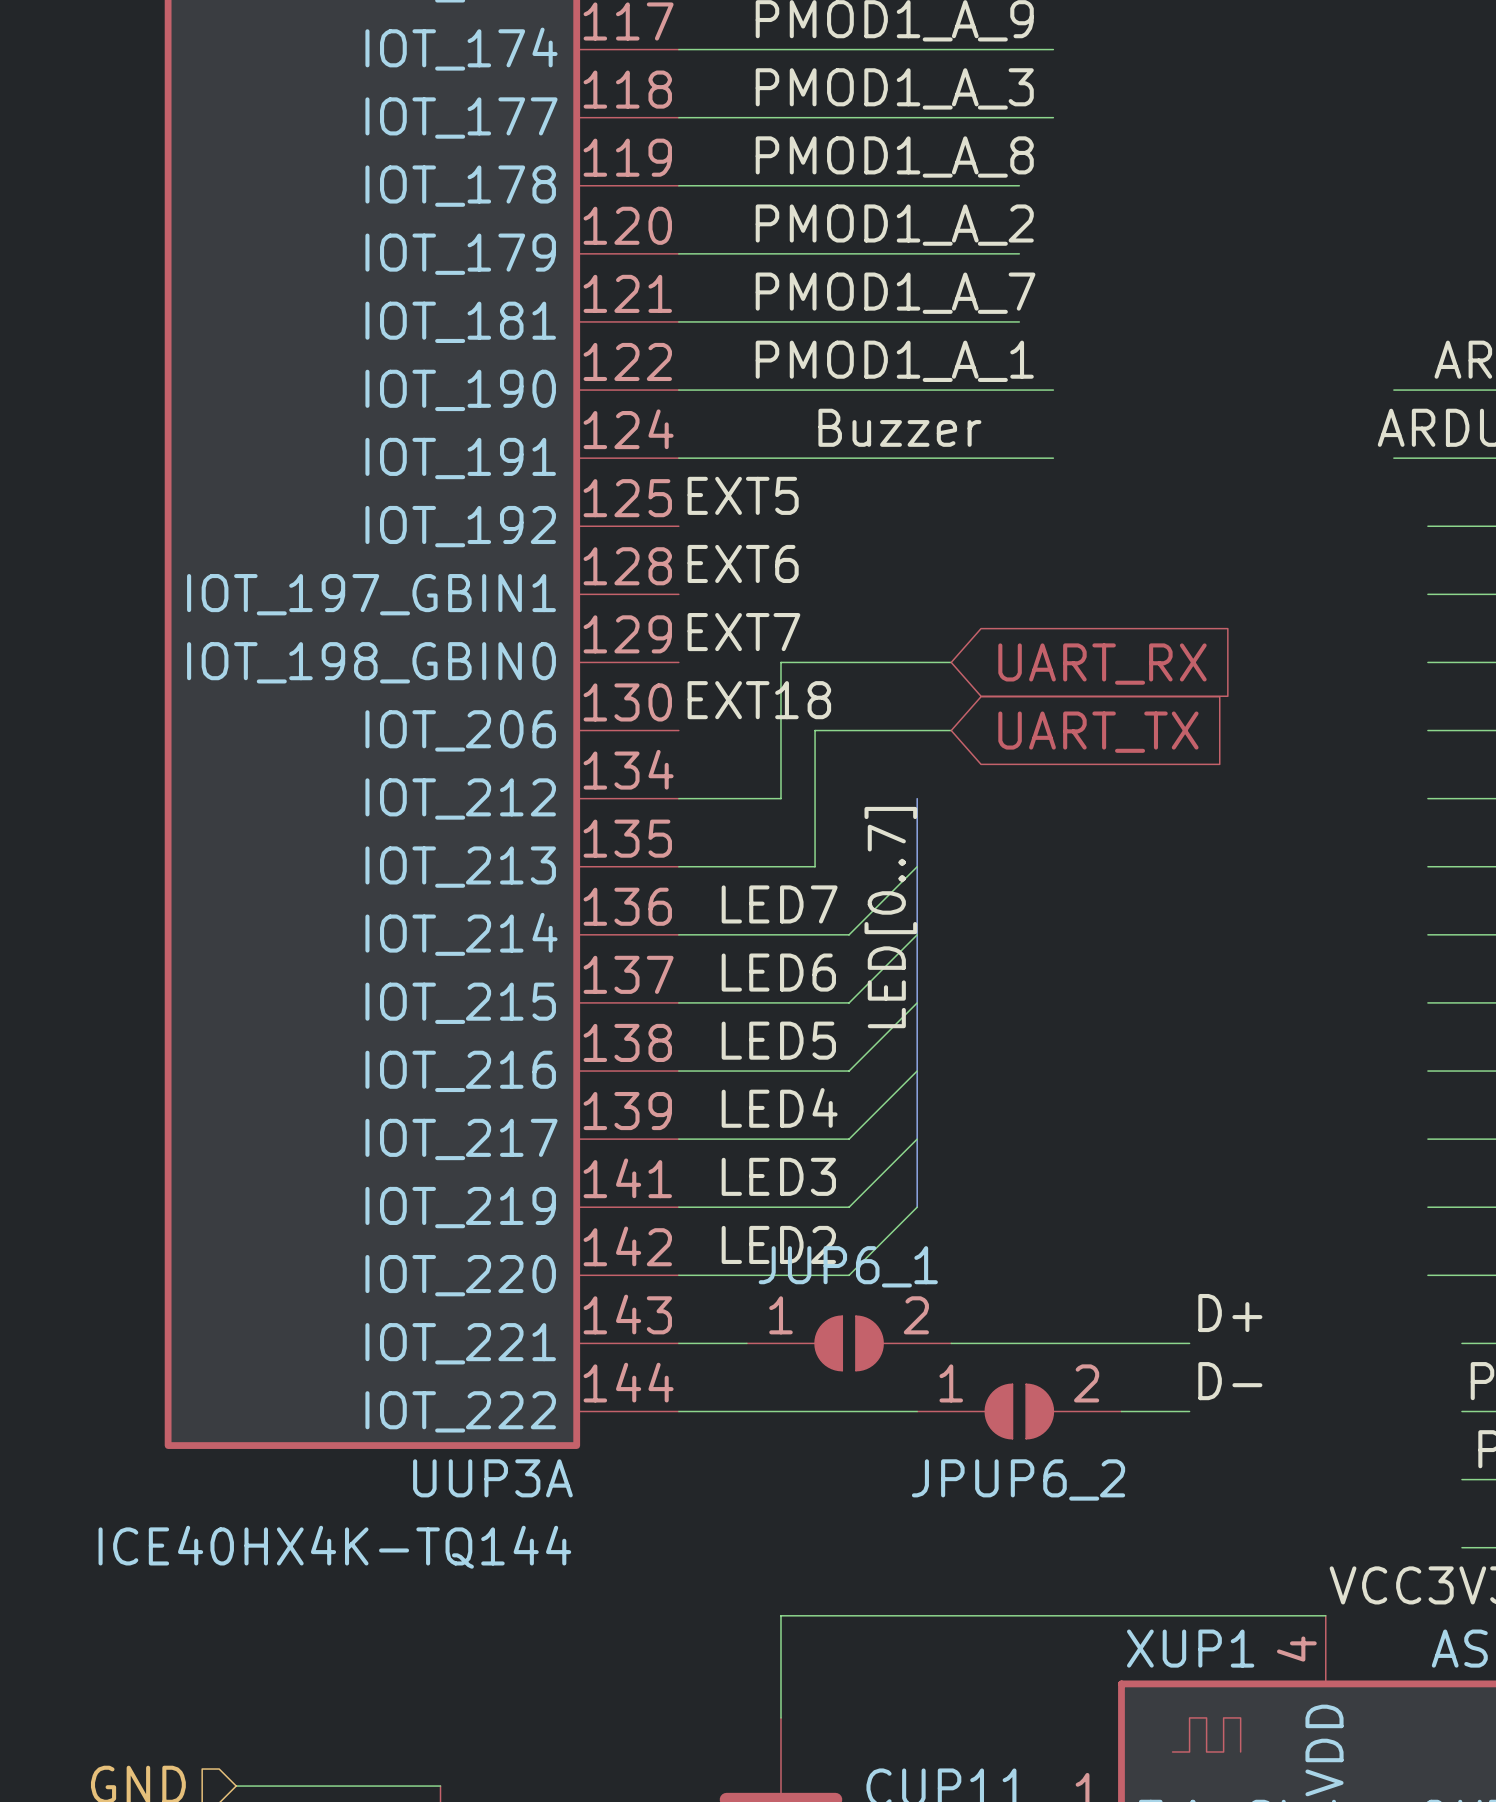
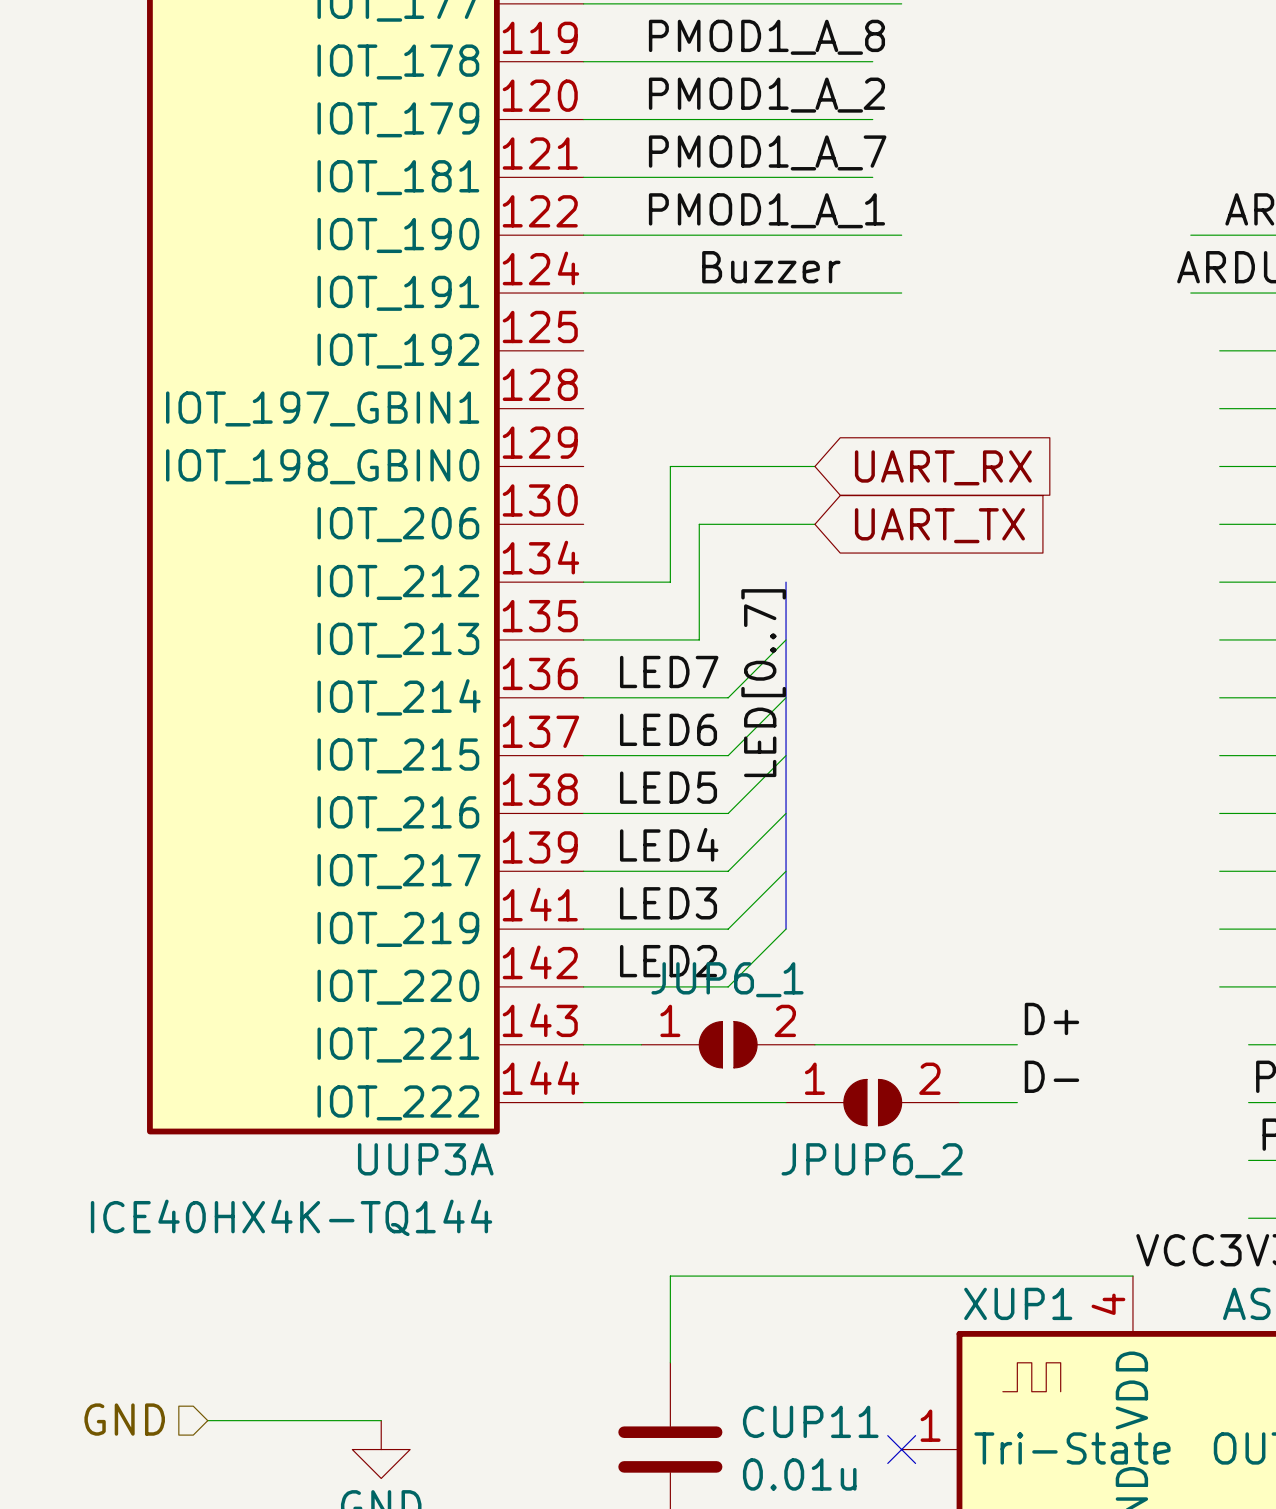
label: EXT5 (743, 495) -> none
label: EXT6 (743, 563) -> none
label: EXT7 (743, 632) -> none
label: EXT18 (759, 700) -> none

